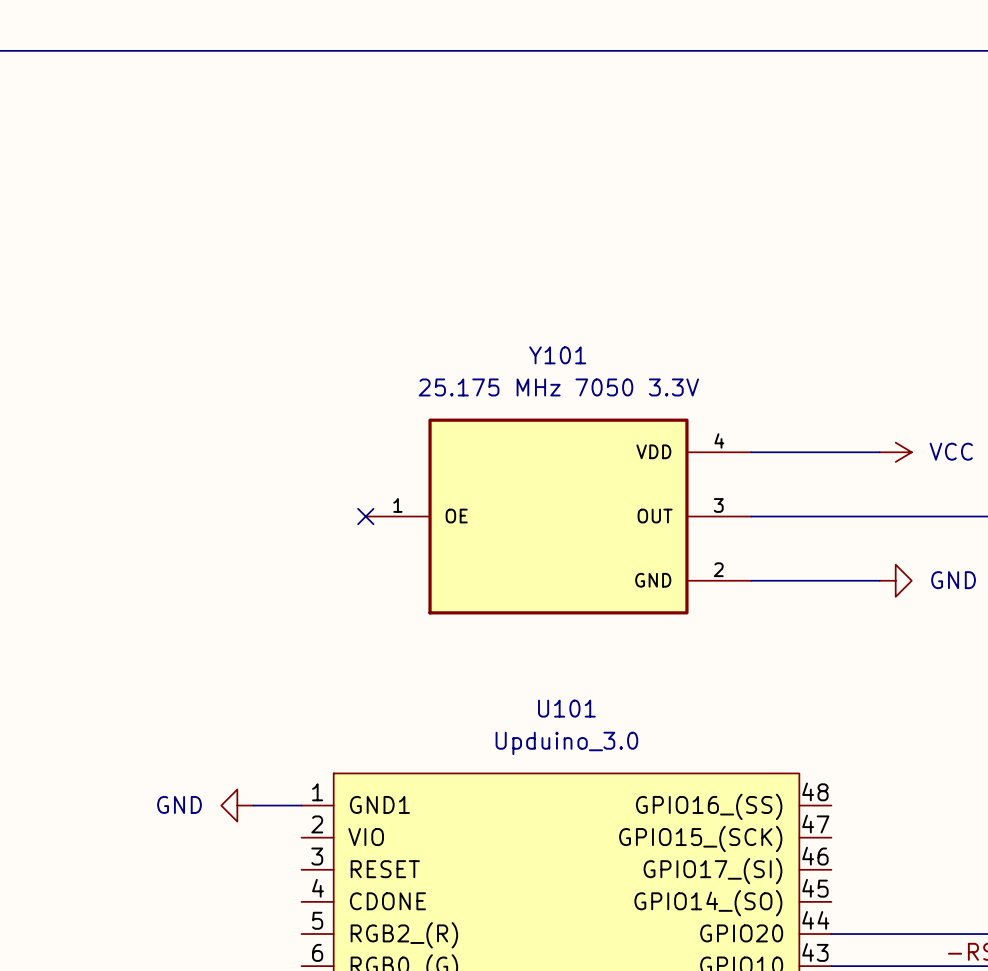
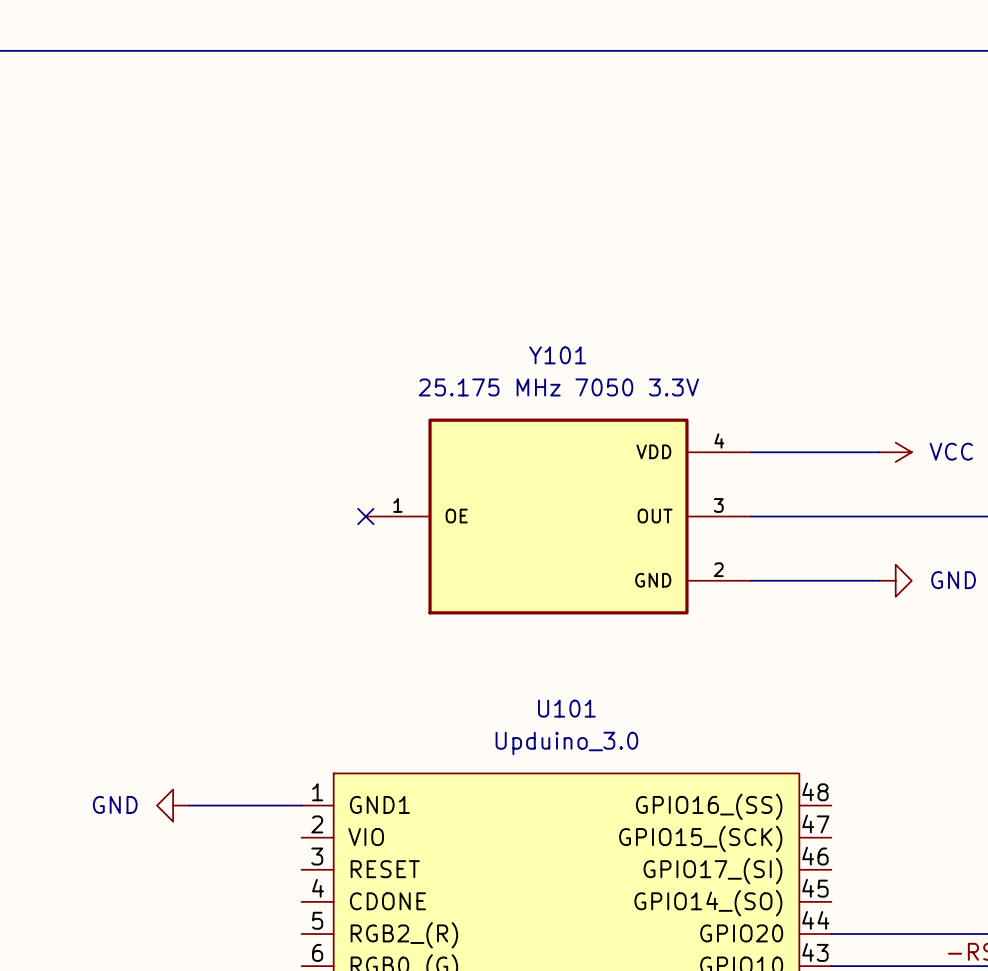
wire: none -> (189, 805) (253, 805)
power symbol position: GND (237, 805) -> GND (173, 805)

